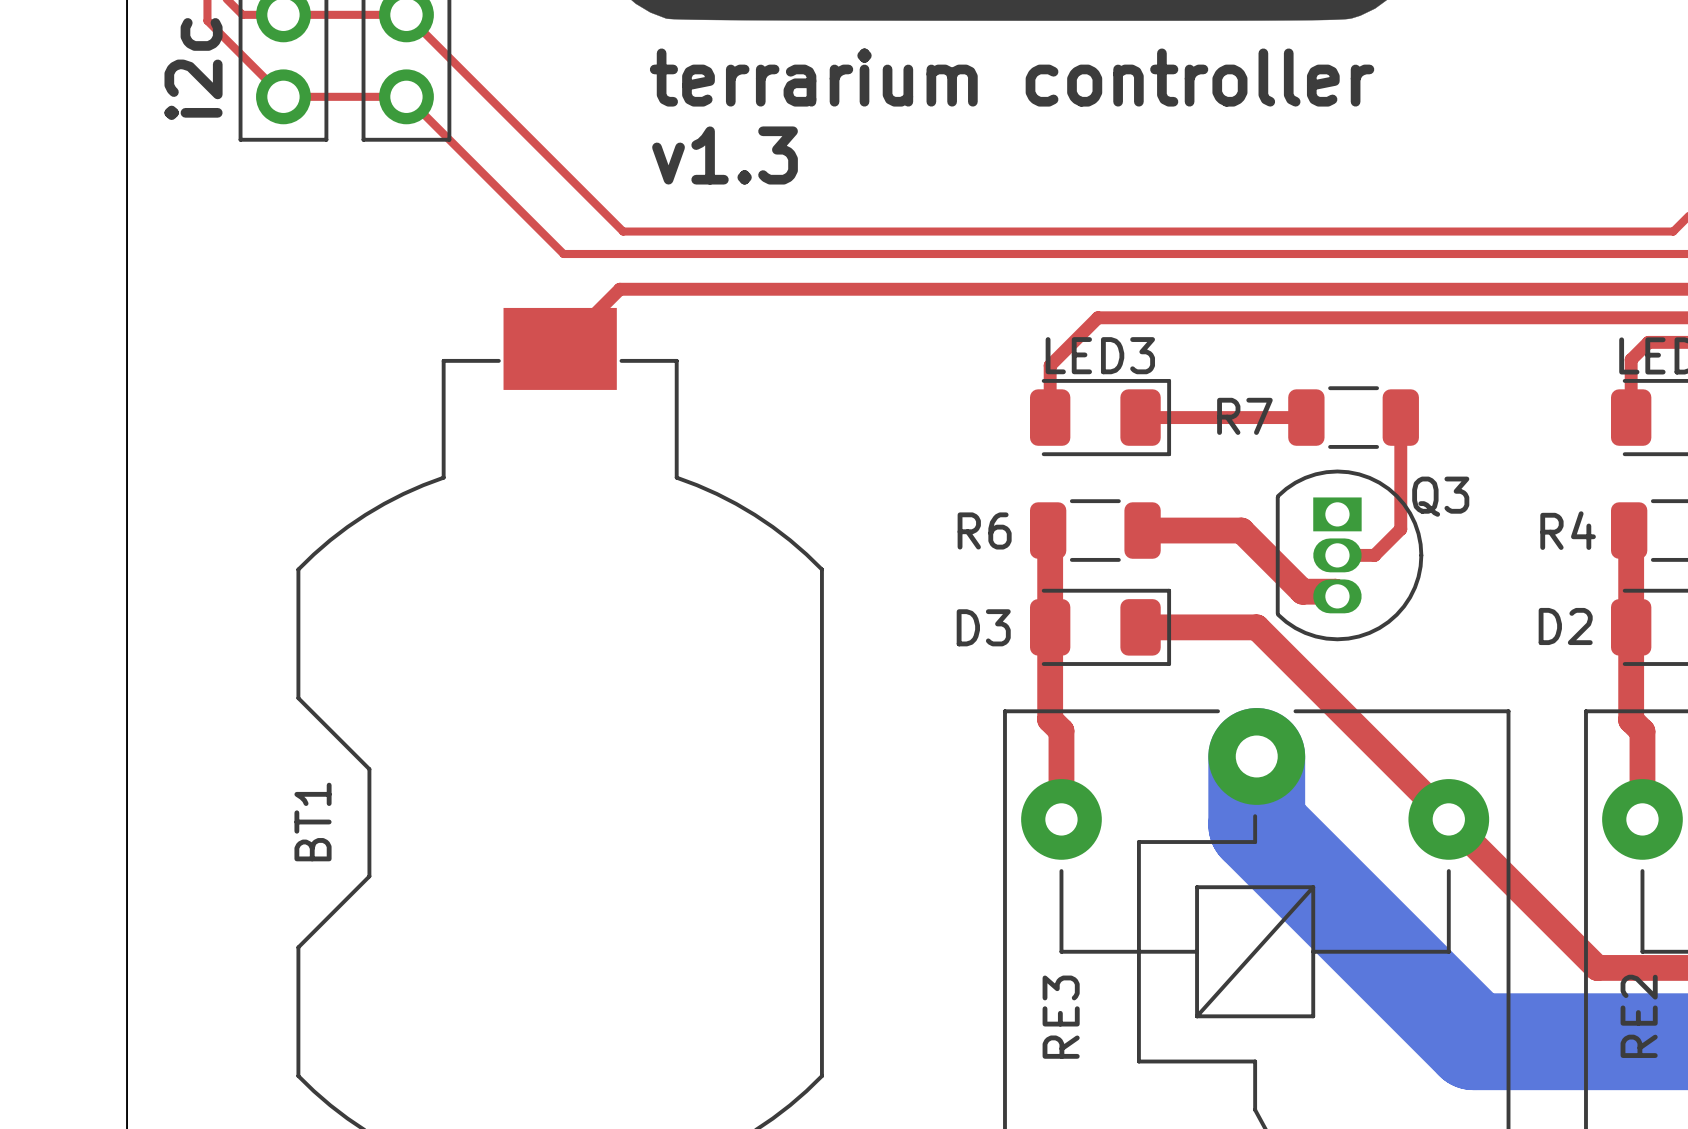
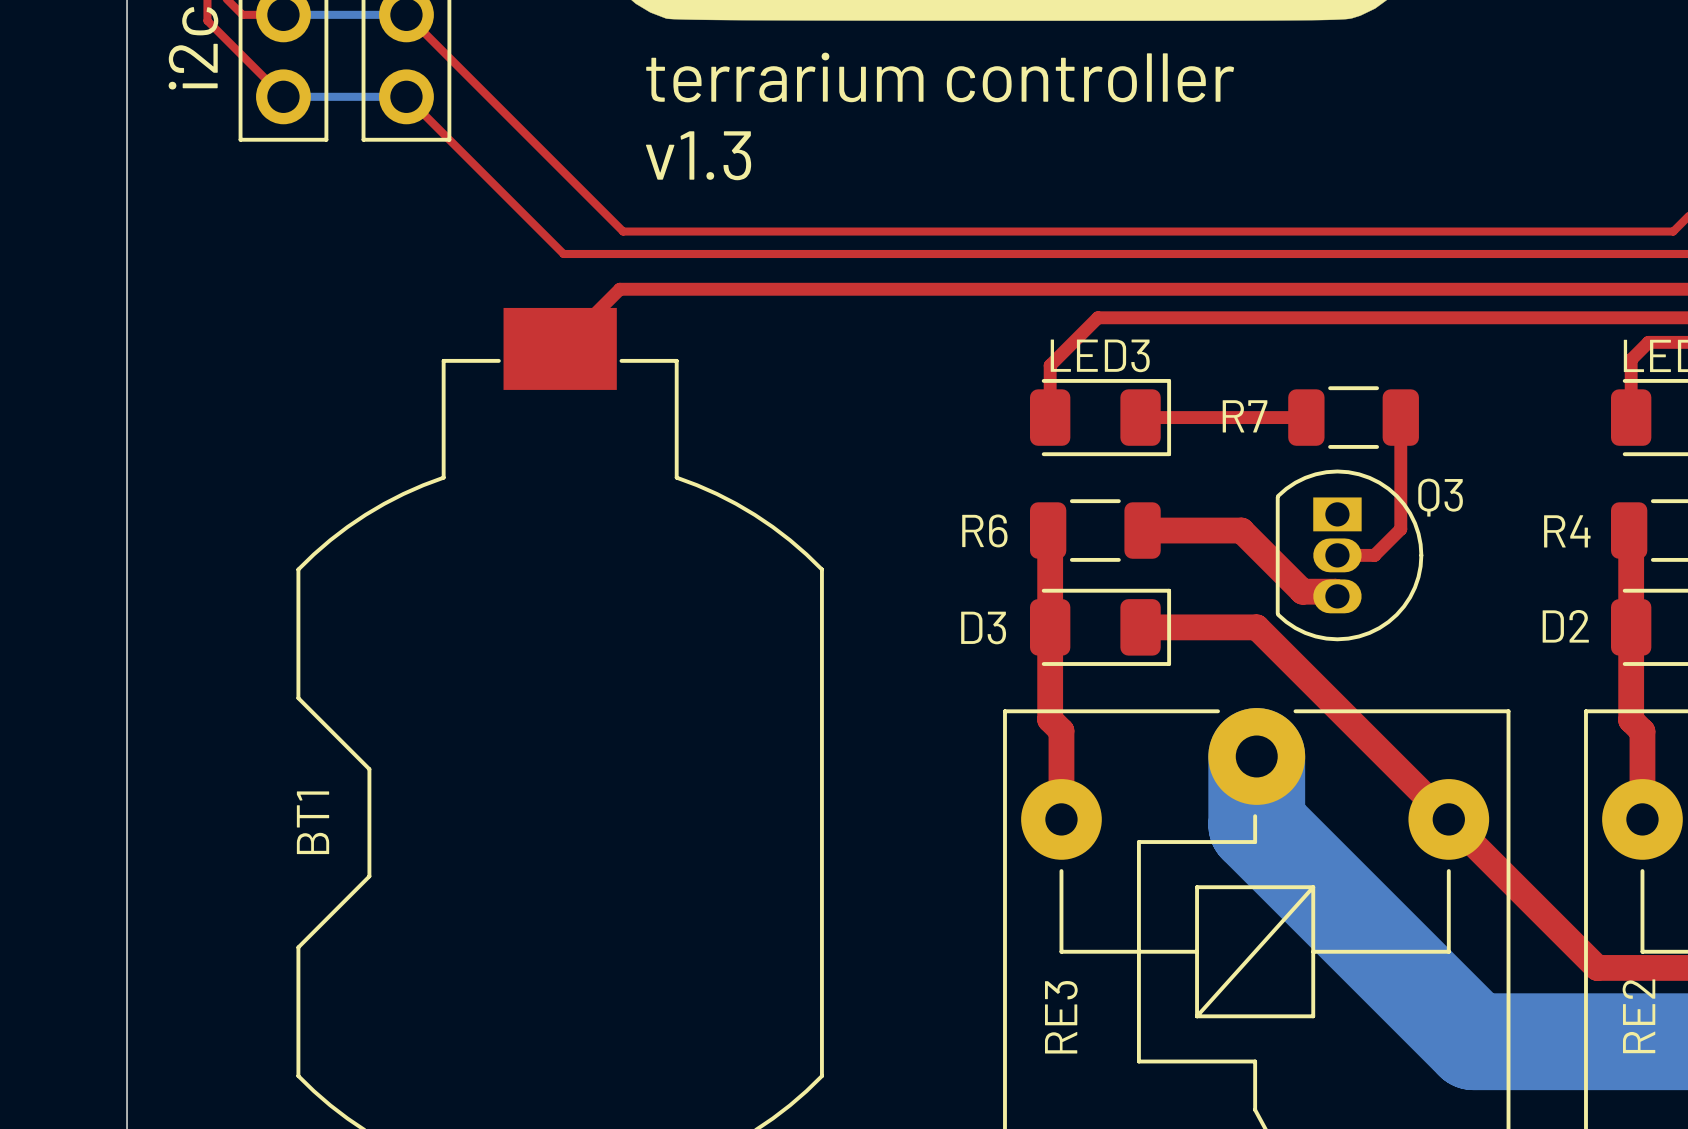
top track: (283, 14) (406, 14) -> none
bottom track: none -> (283, 14) (406, 14)
top track: (283, 96) (406, 96) -> none
bottom track: none -> (283, 96) (406, 96)

